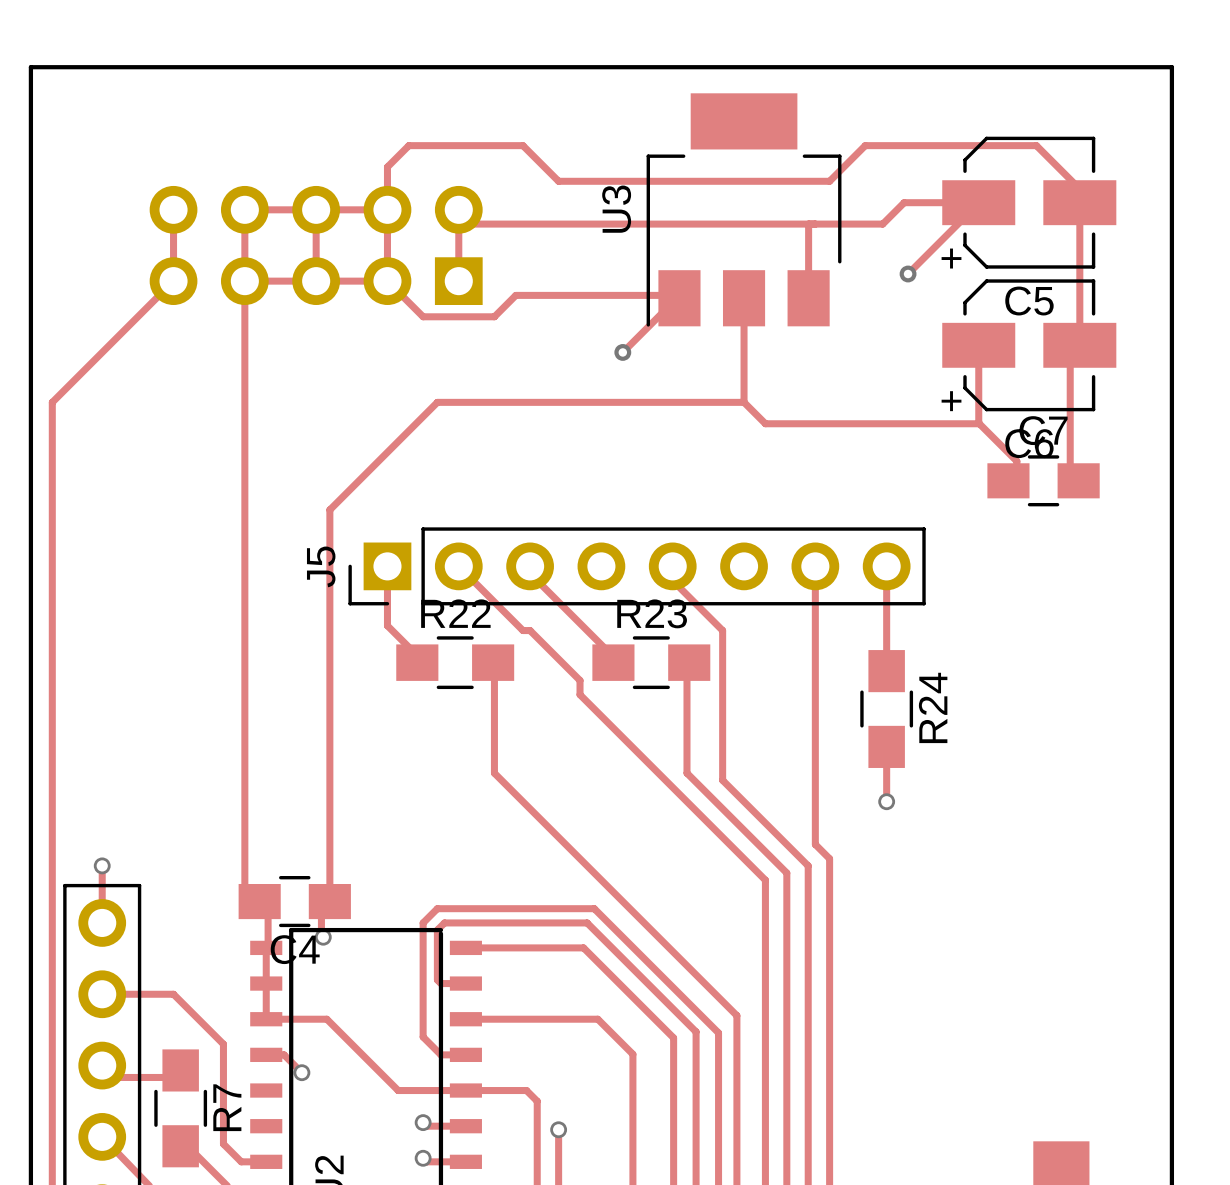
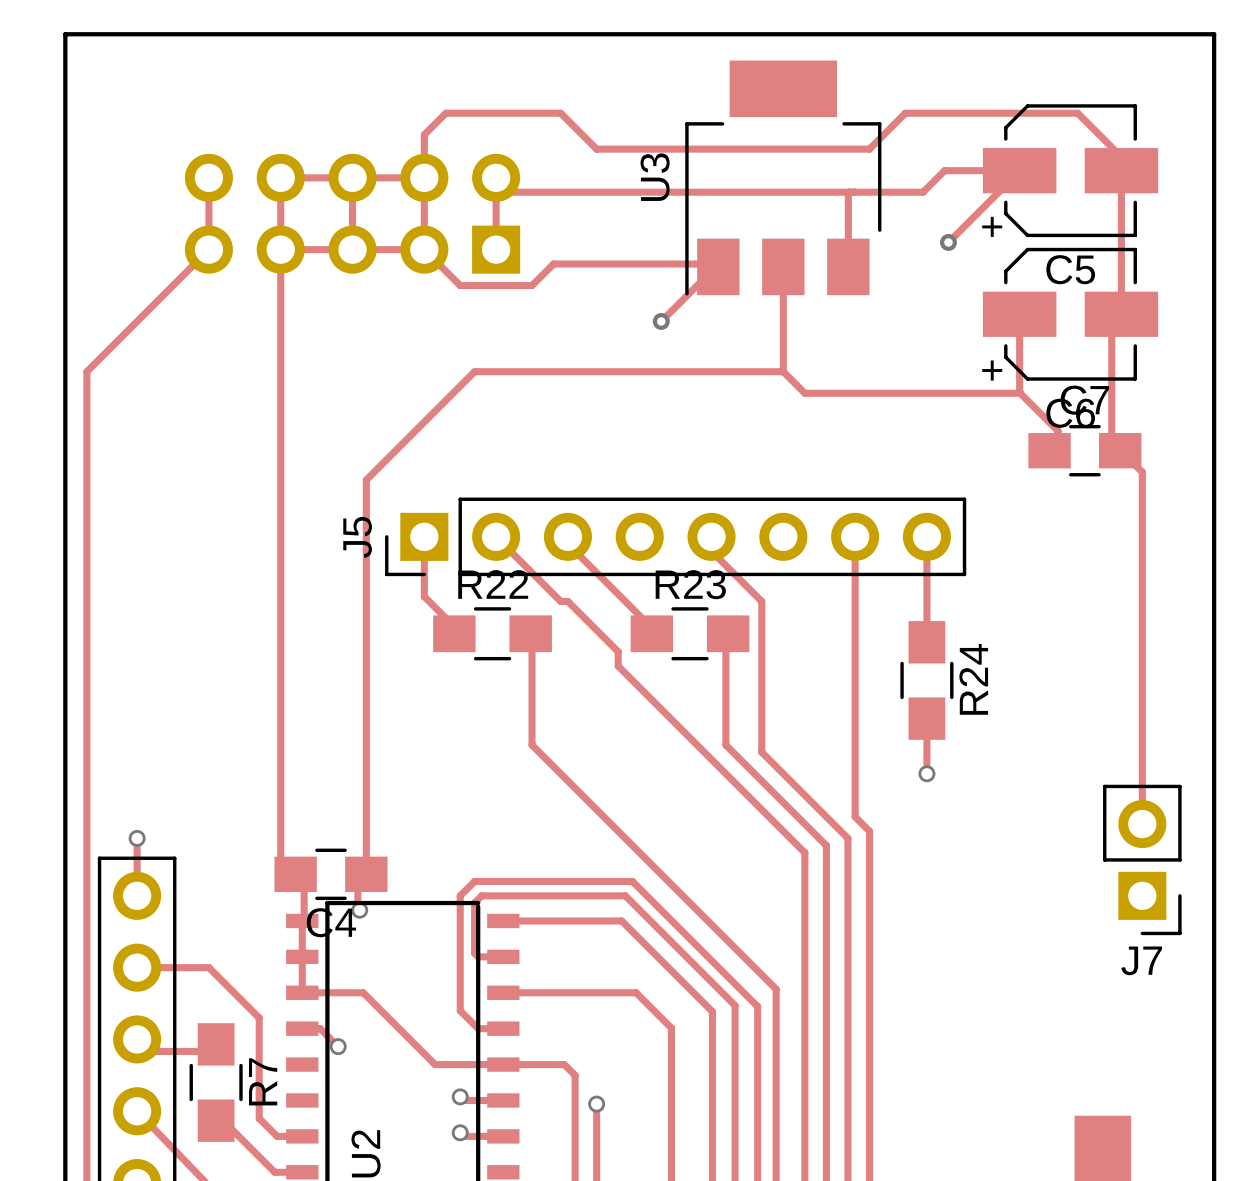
track: none -> (1120, 450) (1142, 472) (1142, 824)
J7: none -> (1142, 859)

